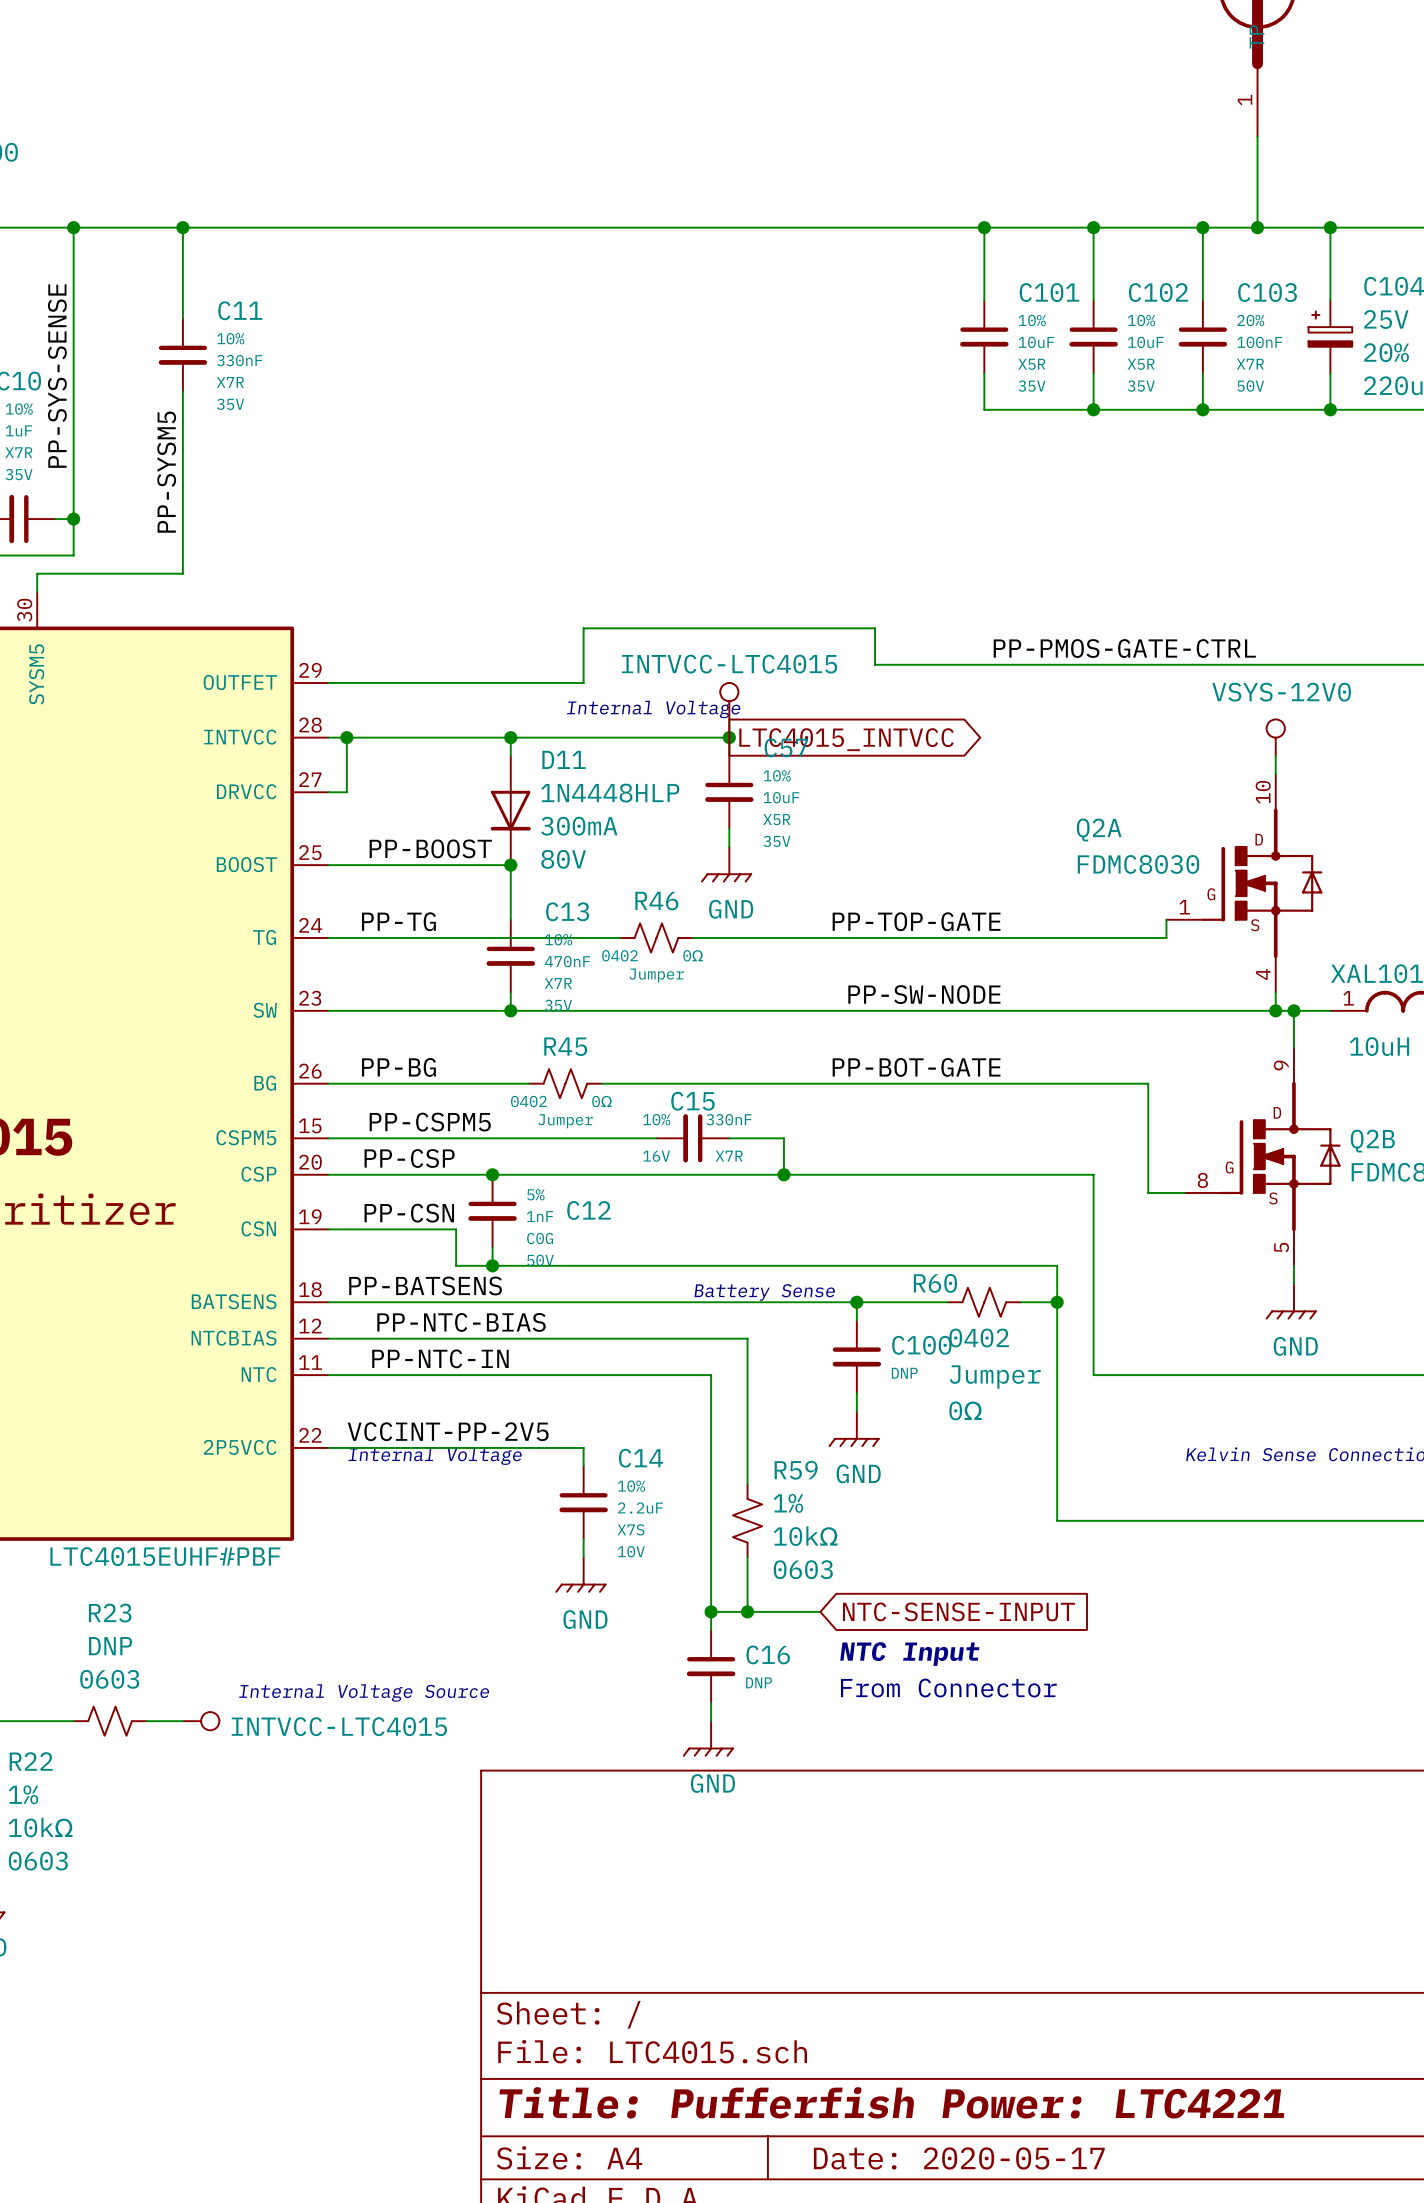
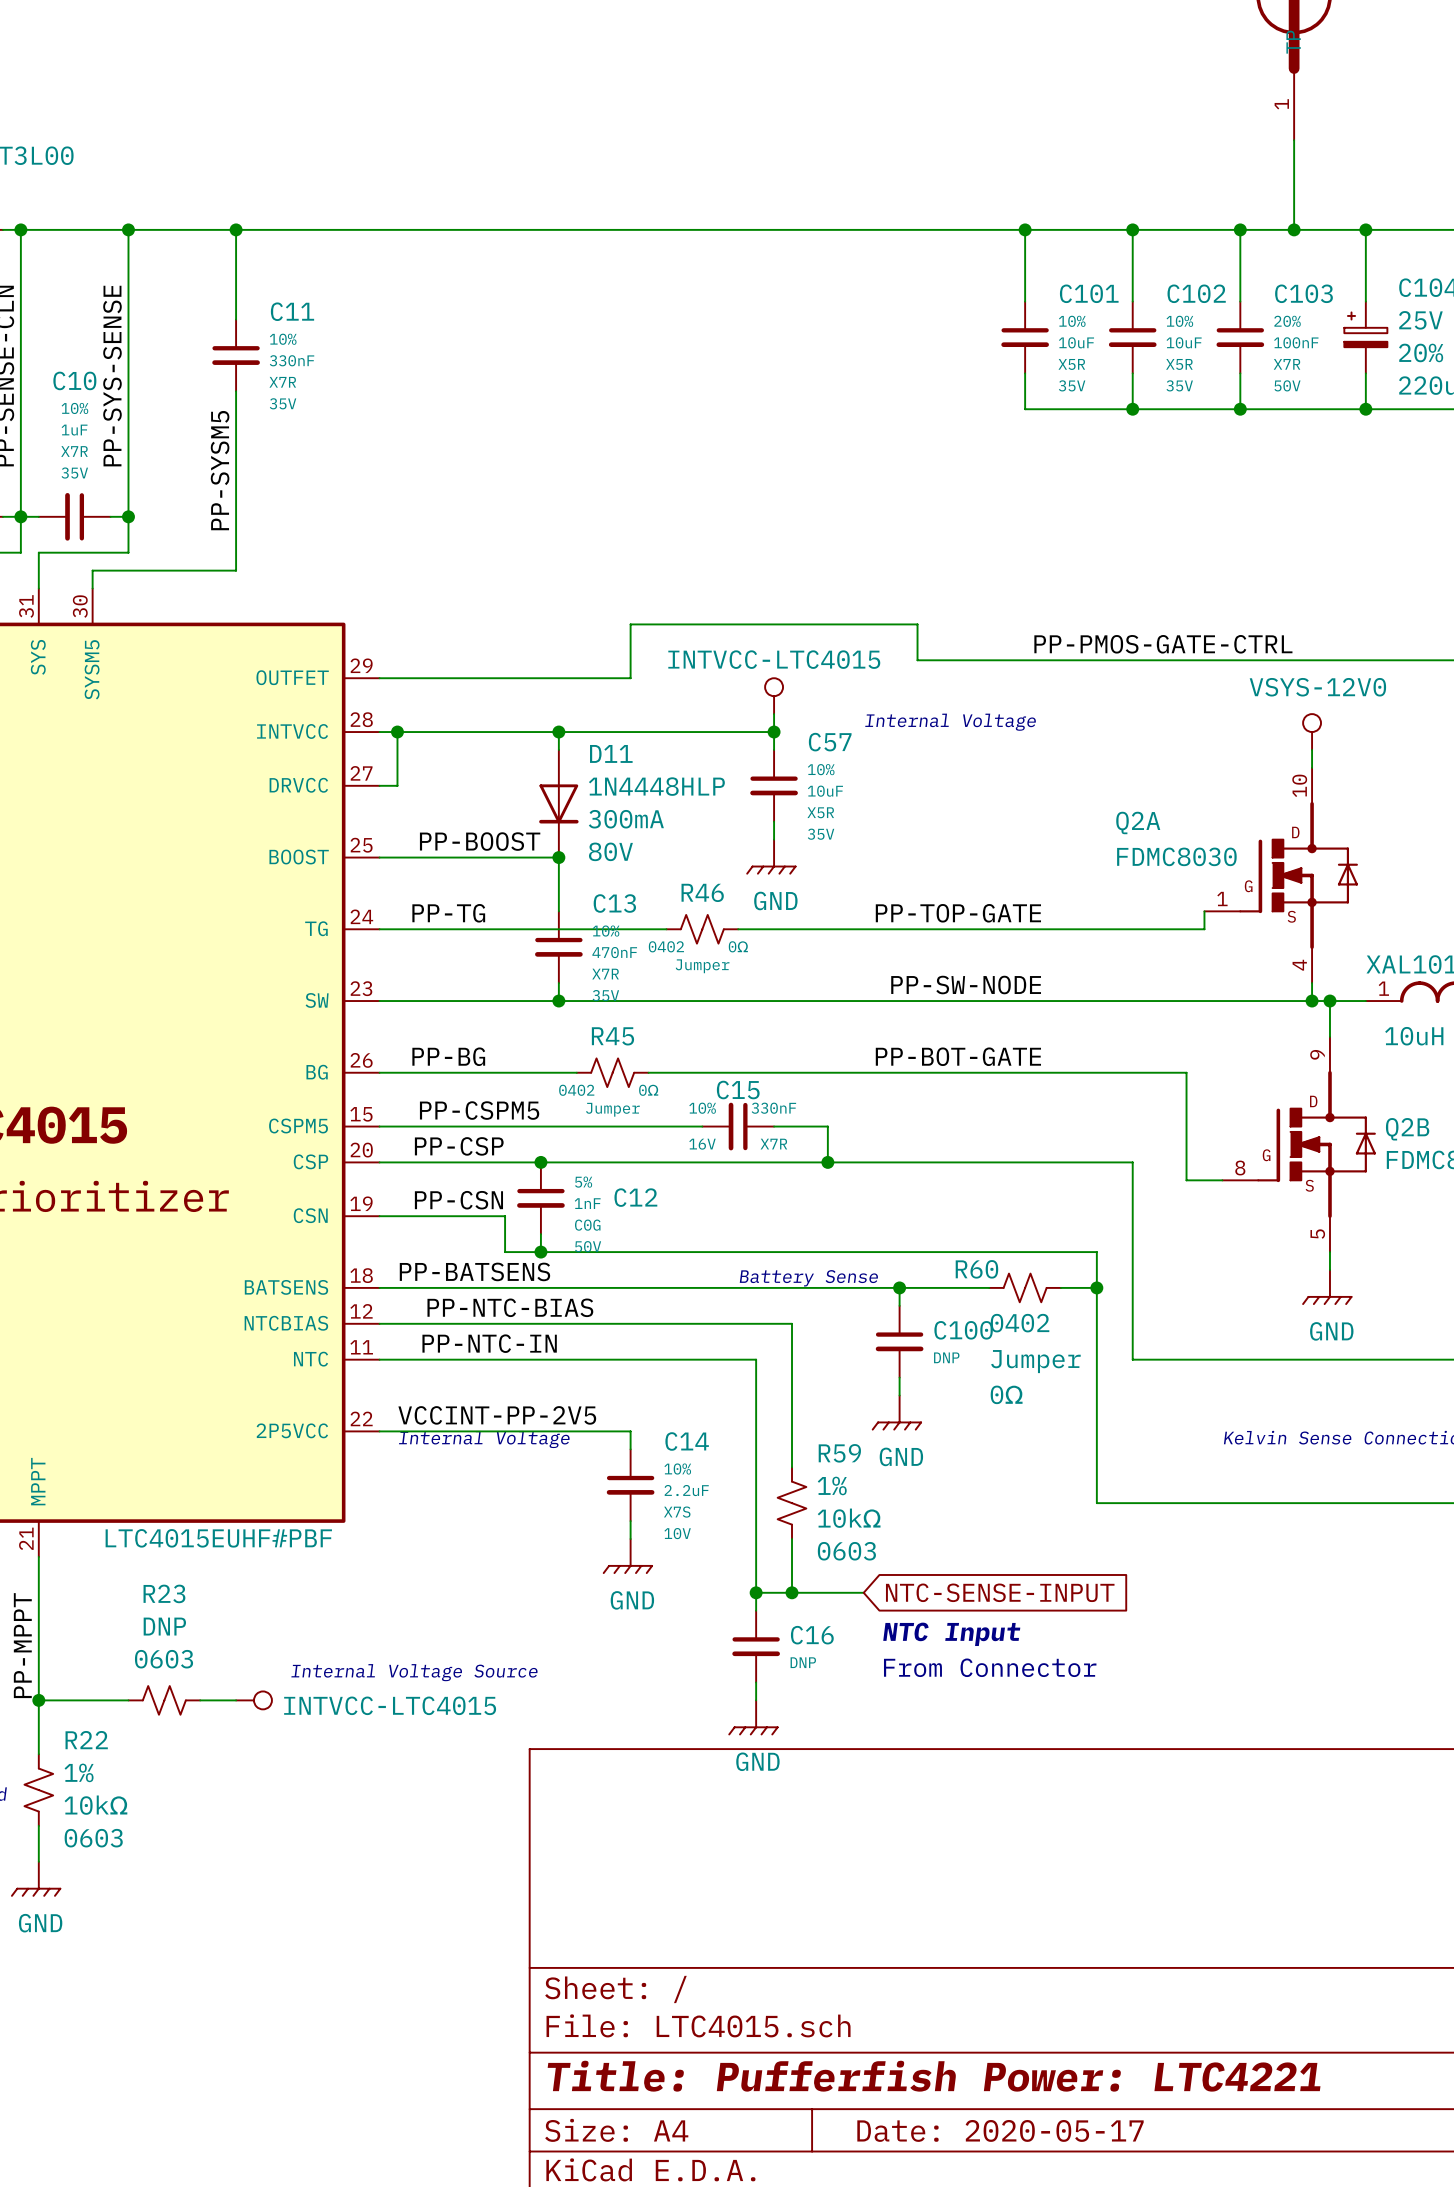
text position: Internal Voltage (653, 709) -> Internal Voltage (950, 722)
global label: LTC4015_INTVCC (846, 739) -> none

